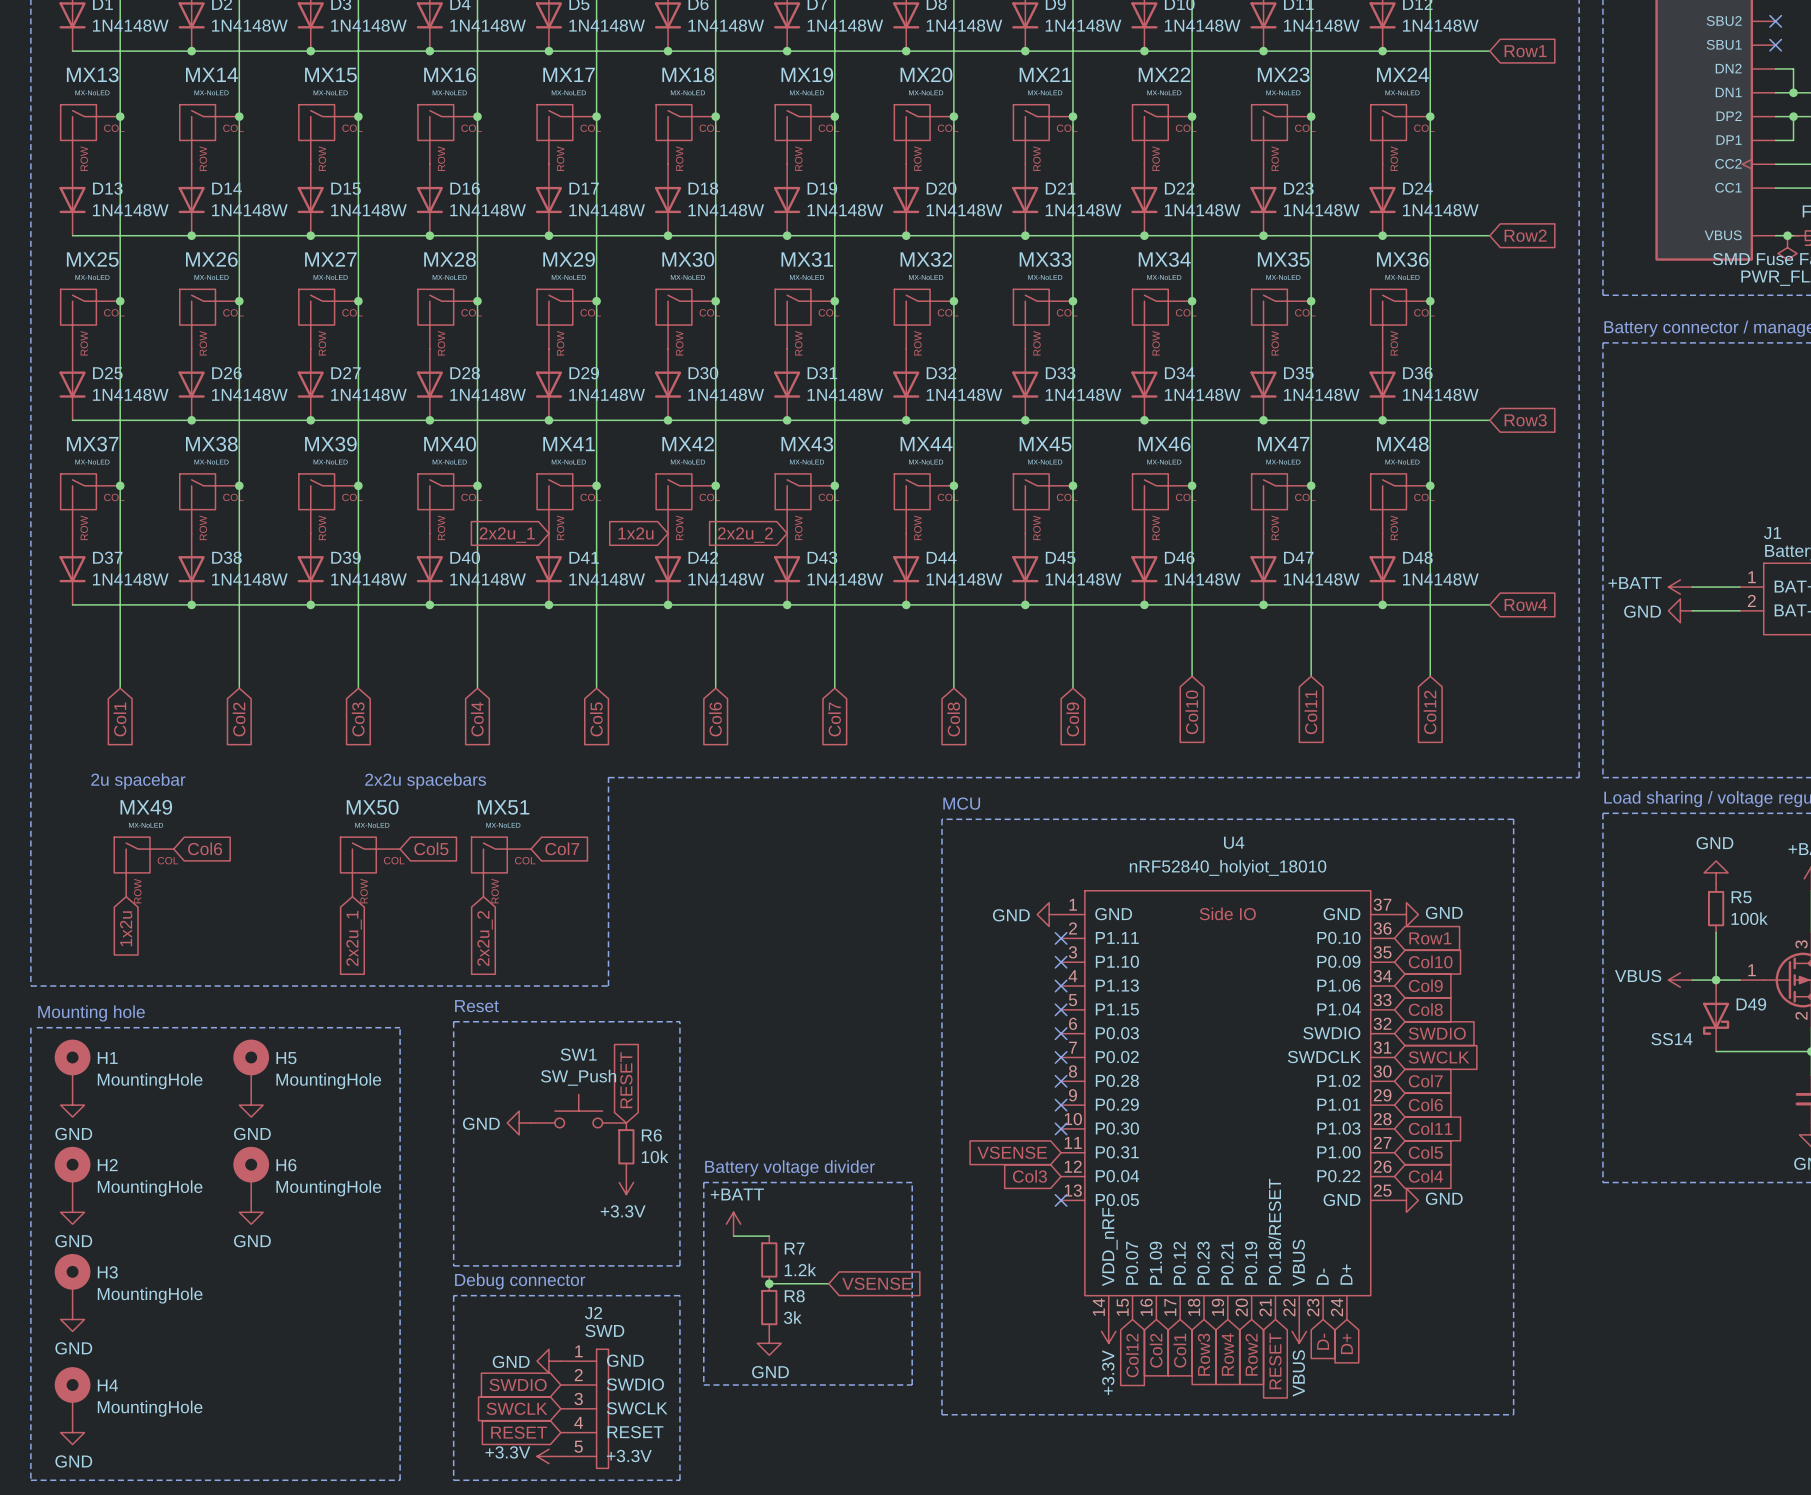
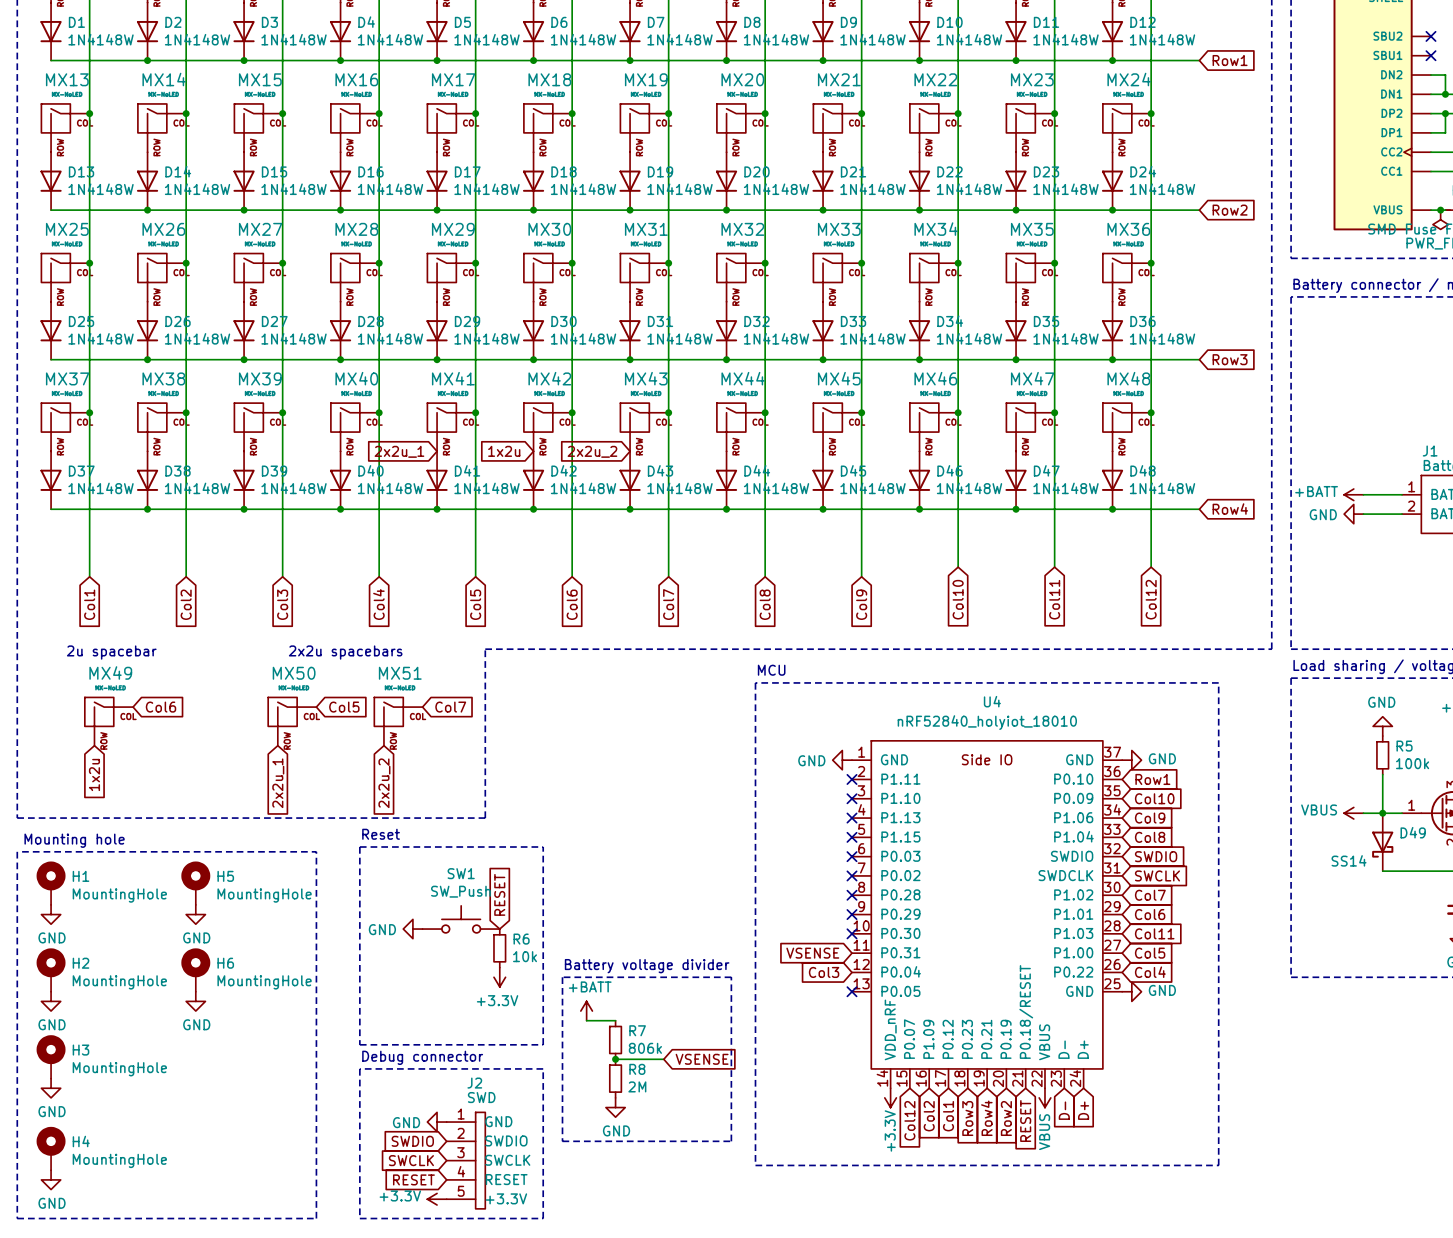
R7 value: 1.2k (800, 1269) -> 806k (645, 1048)
R8 value: 3k (792, 1317) -> 2M (637, 1086)

